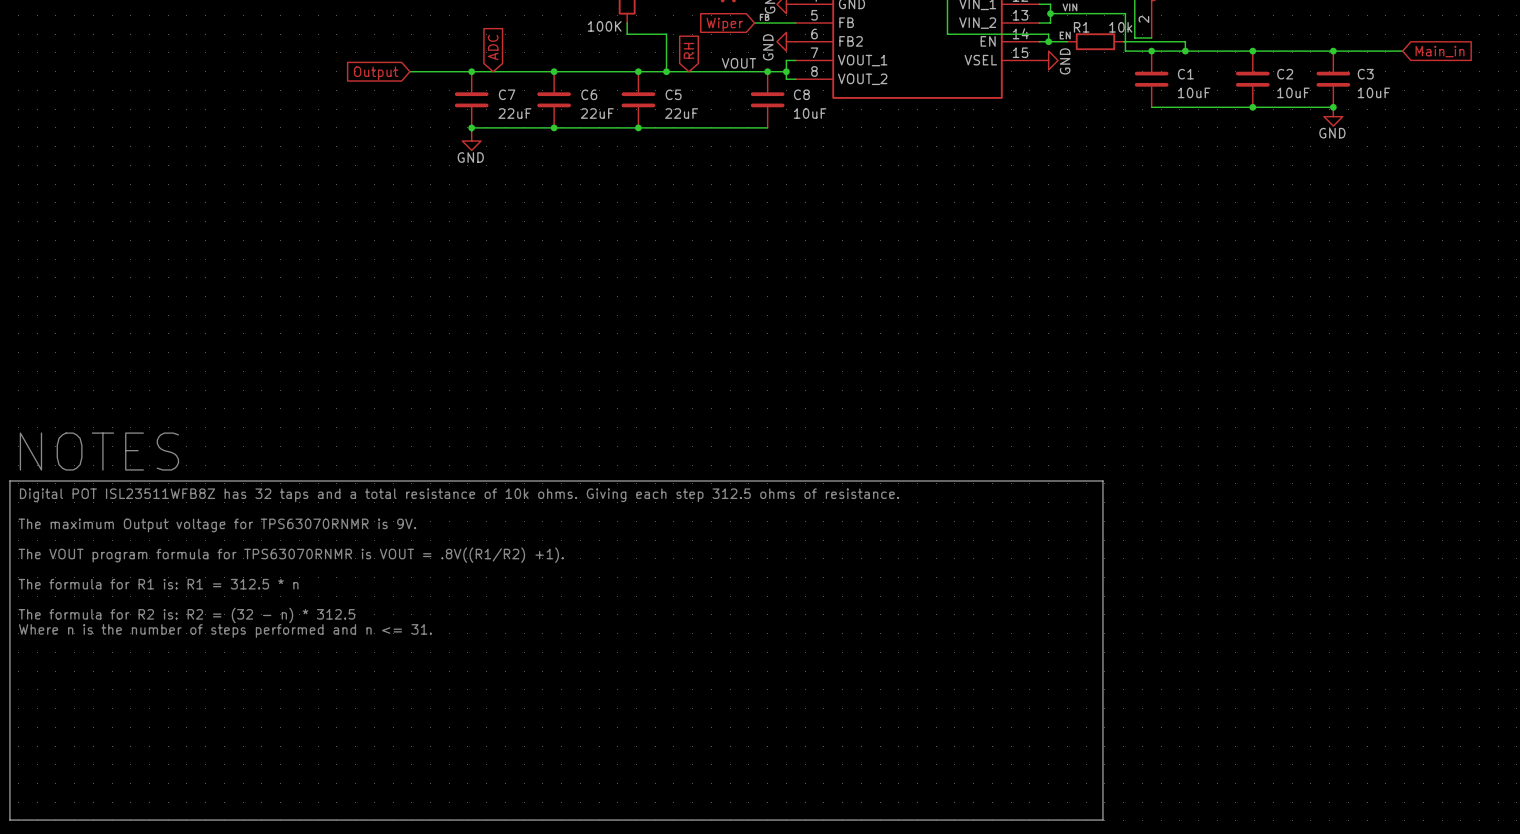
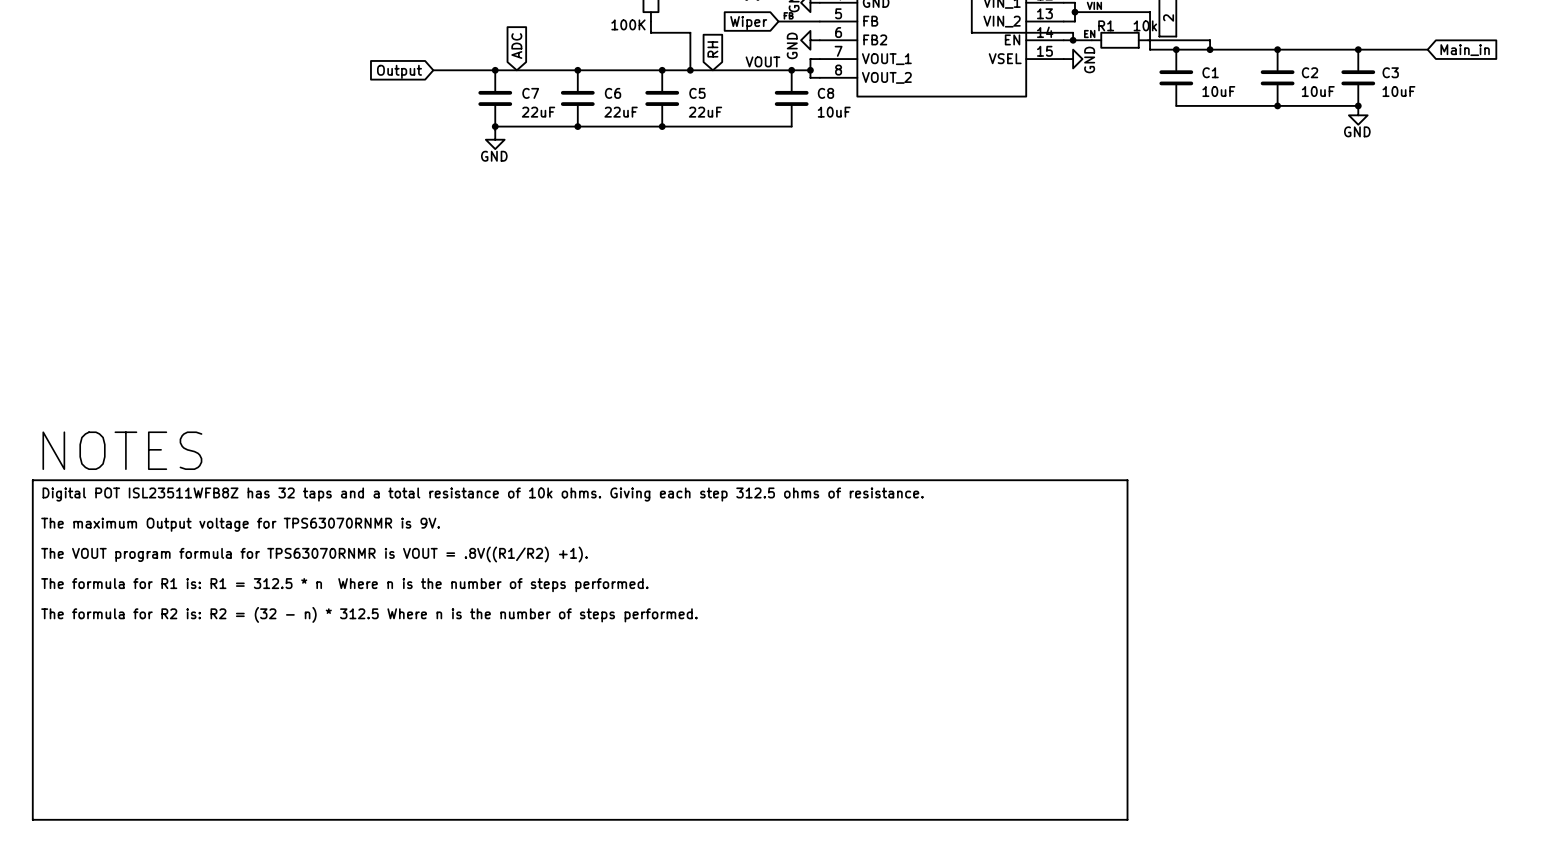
text: The formula for R1 is: R1 = 312.5 * n (158, 584) -> The formula for R1 is: R1 = 312.5 * n Where n is the number of steps performed. (344, 585)
text: The formula for R2 is: R2 = (32 - n) * 312.5 (186, 615) -> The formula for R2 is: R2 = (32 - n) * 312.5 Where n is the number of steps performed. (369, 614)
text: Where n is the number of steps performed and n <= 31. (225, 630) -> none

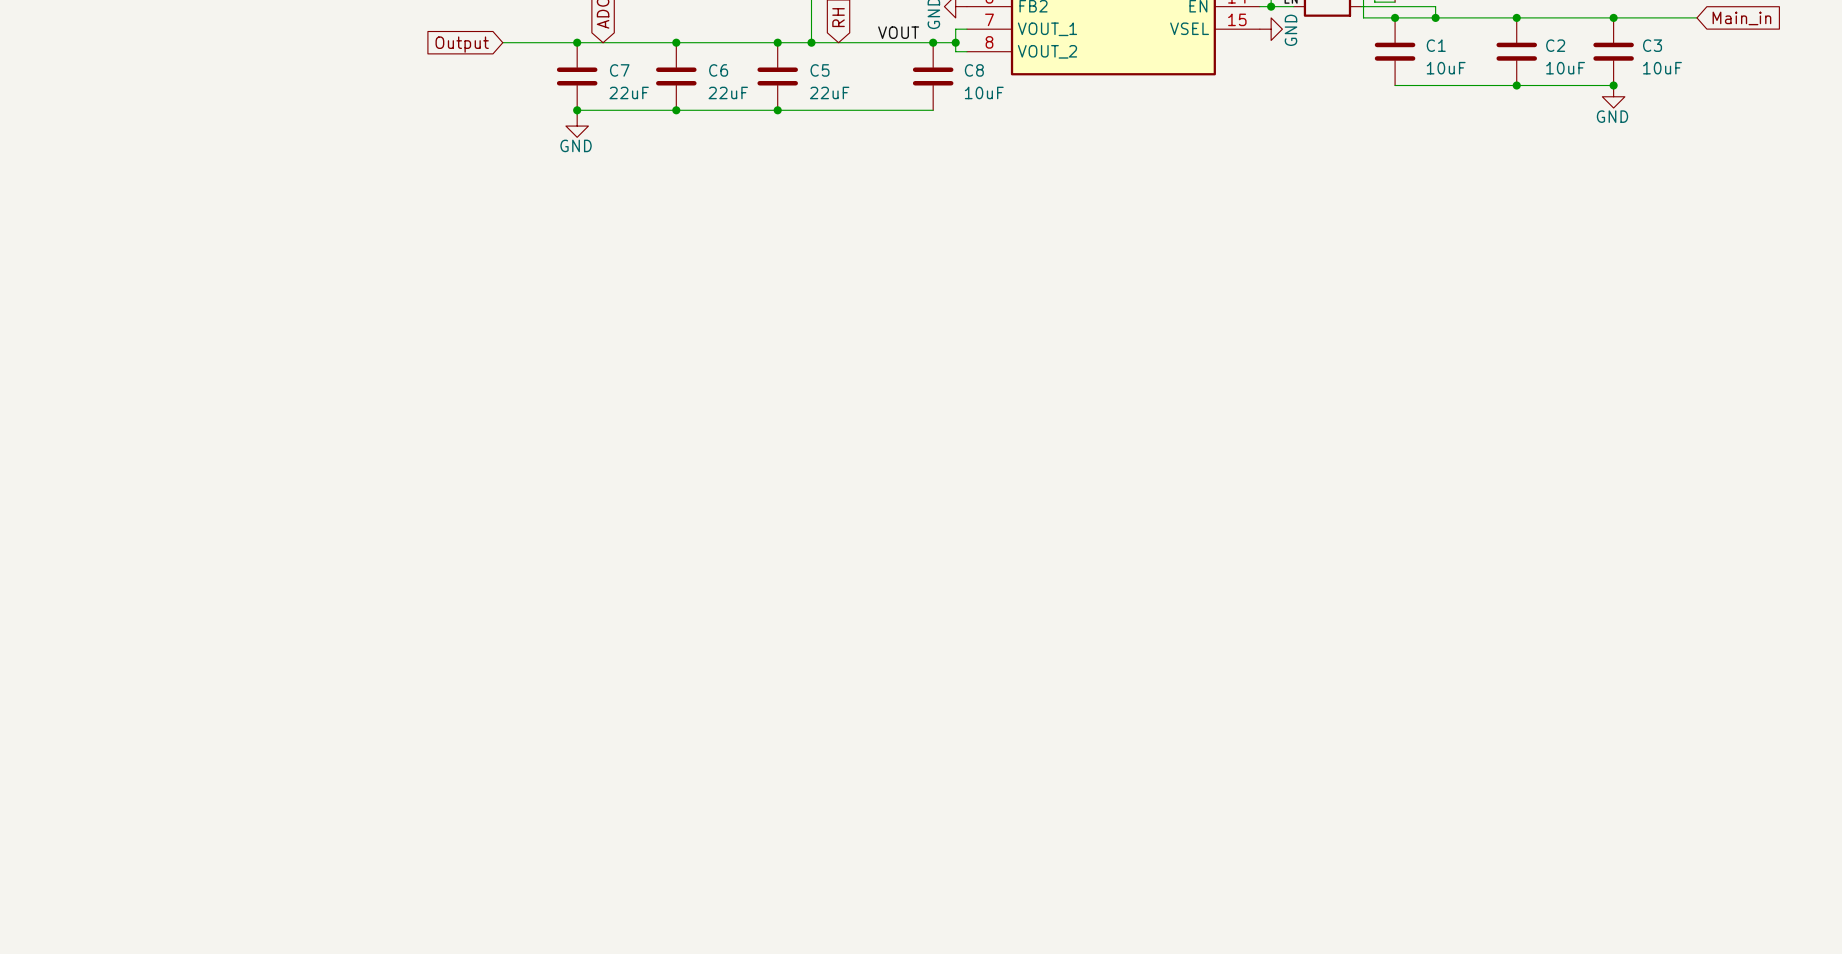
text: NOTES (122, 450) -> none
line: (32, 480) (1127, 480) (1127, 819) (32, 819) (32, 480) -> none
text: Digital POT ISL23511WFB8Z has 32 taps and a total resistance of 10k ohms. Giving each step 312.5 ohms of resistance. (483, 494) -> none
text: The maximum Output voltage for TPS63070RNMR is 9V. (240, 524) -> none
text: The VOUT program formula for TPS63070RNMR is VOUT = .8V((R1/R2) +1). (314, 554) -> none
text: The formula for R1 is: R1 = 312.5 * n Where n is the number of steps performed. (344, 585) -> none
text: The formula for R2 is: R2 = (32 - n) * 312.5 Where n is the number of steps performed. (369, 614) -> none

